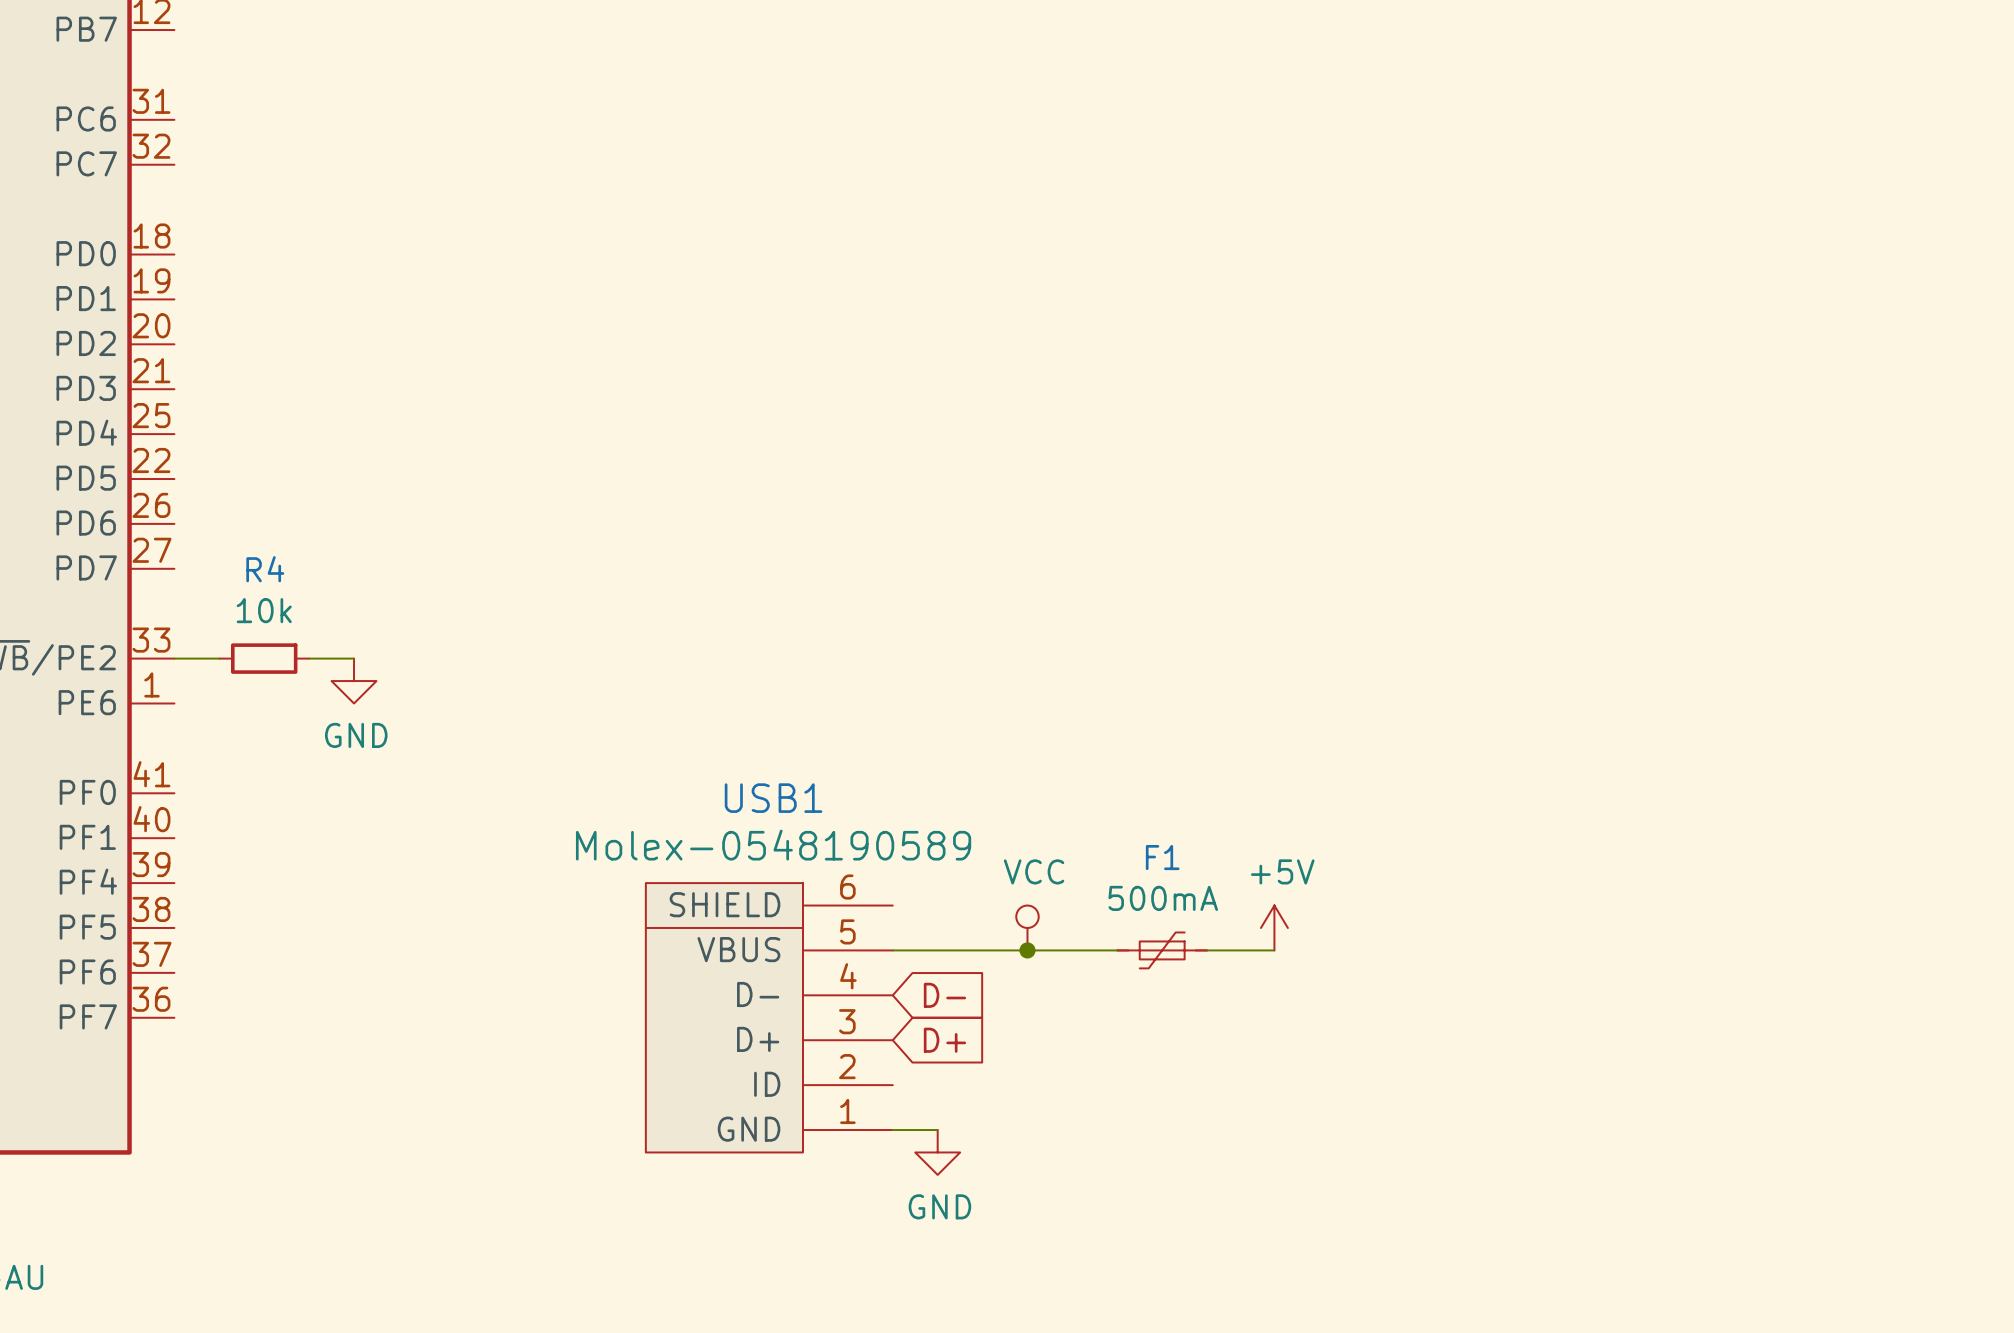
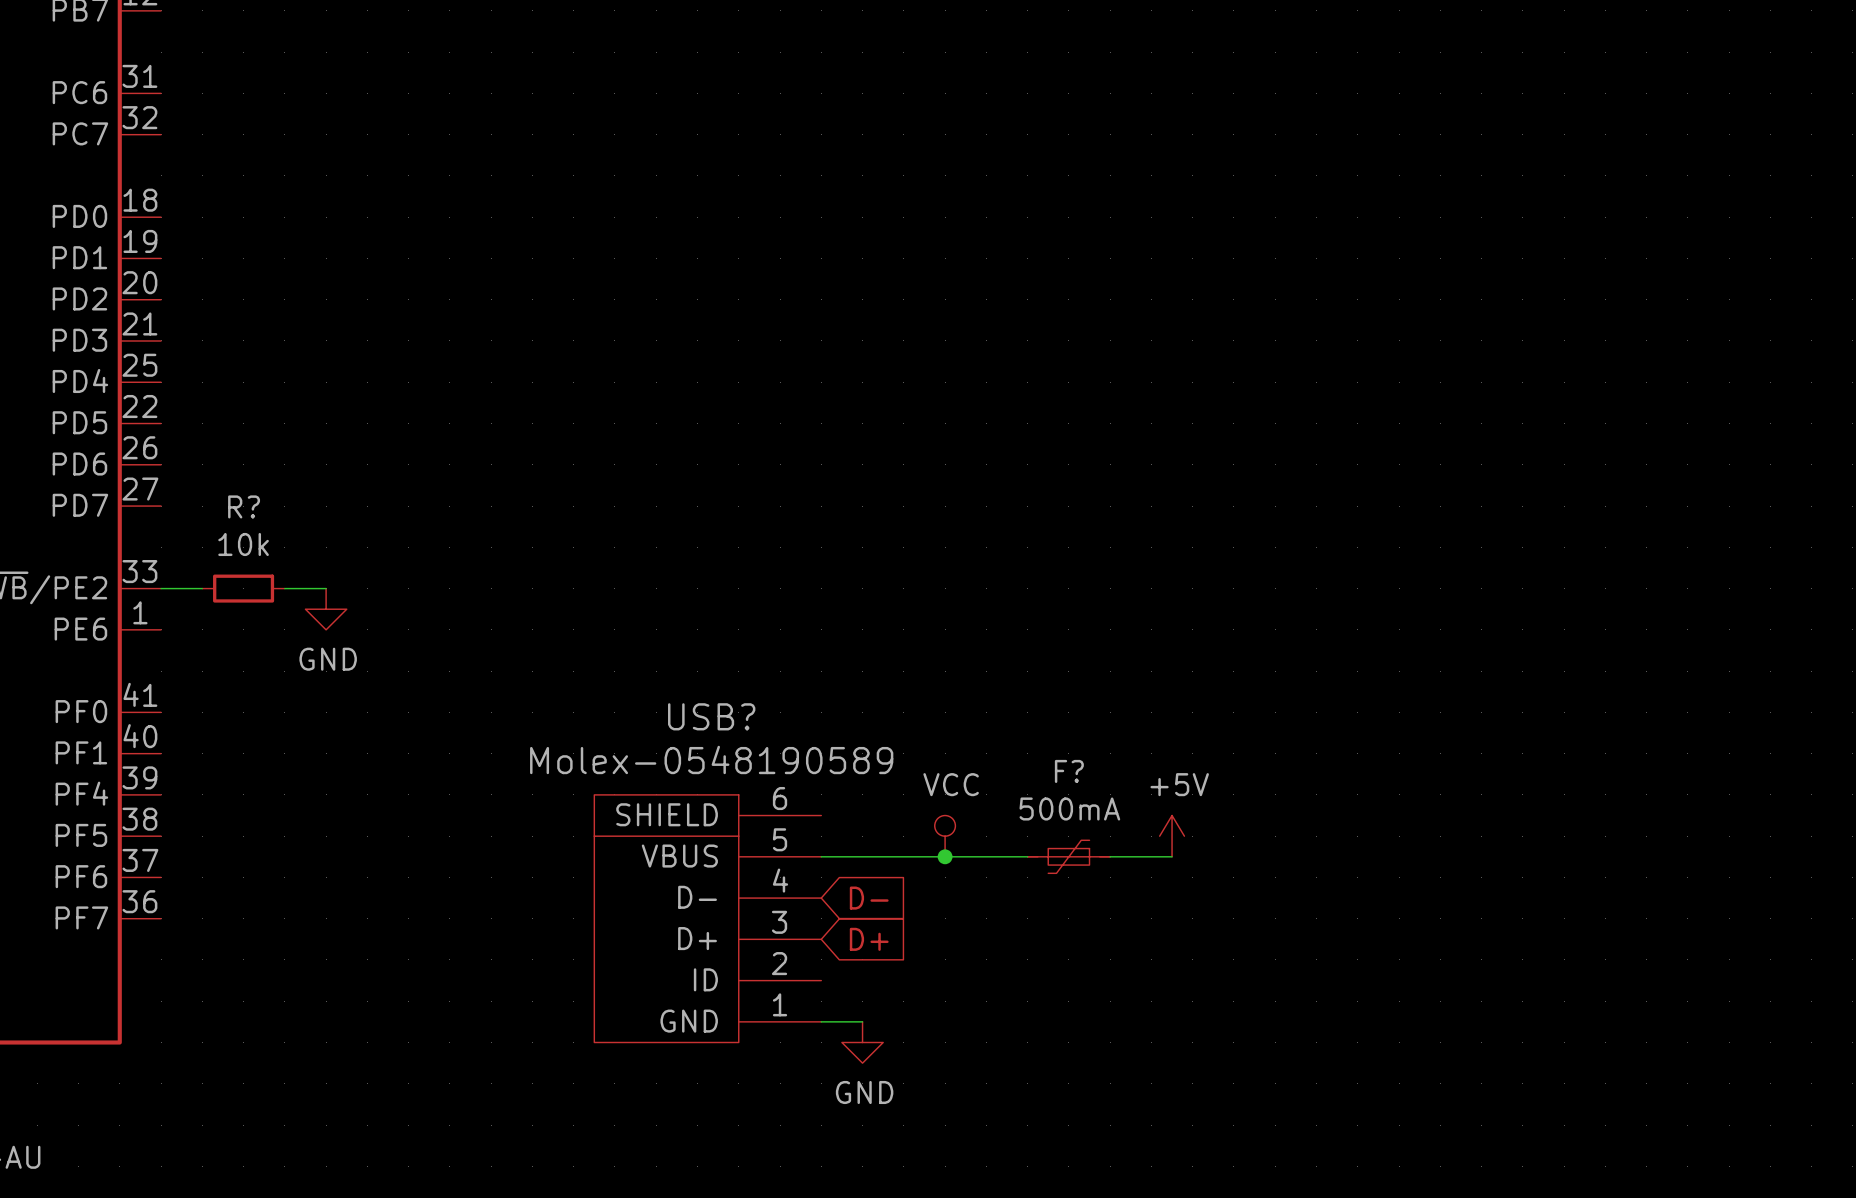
R4 name: R4 (265, 569) -> R? (244, 506)
USB1 name: USB1 (773, 798) -> USB? (711, 716)
F1 name: F1 (1162, 857) -> F? (1069, 771)

